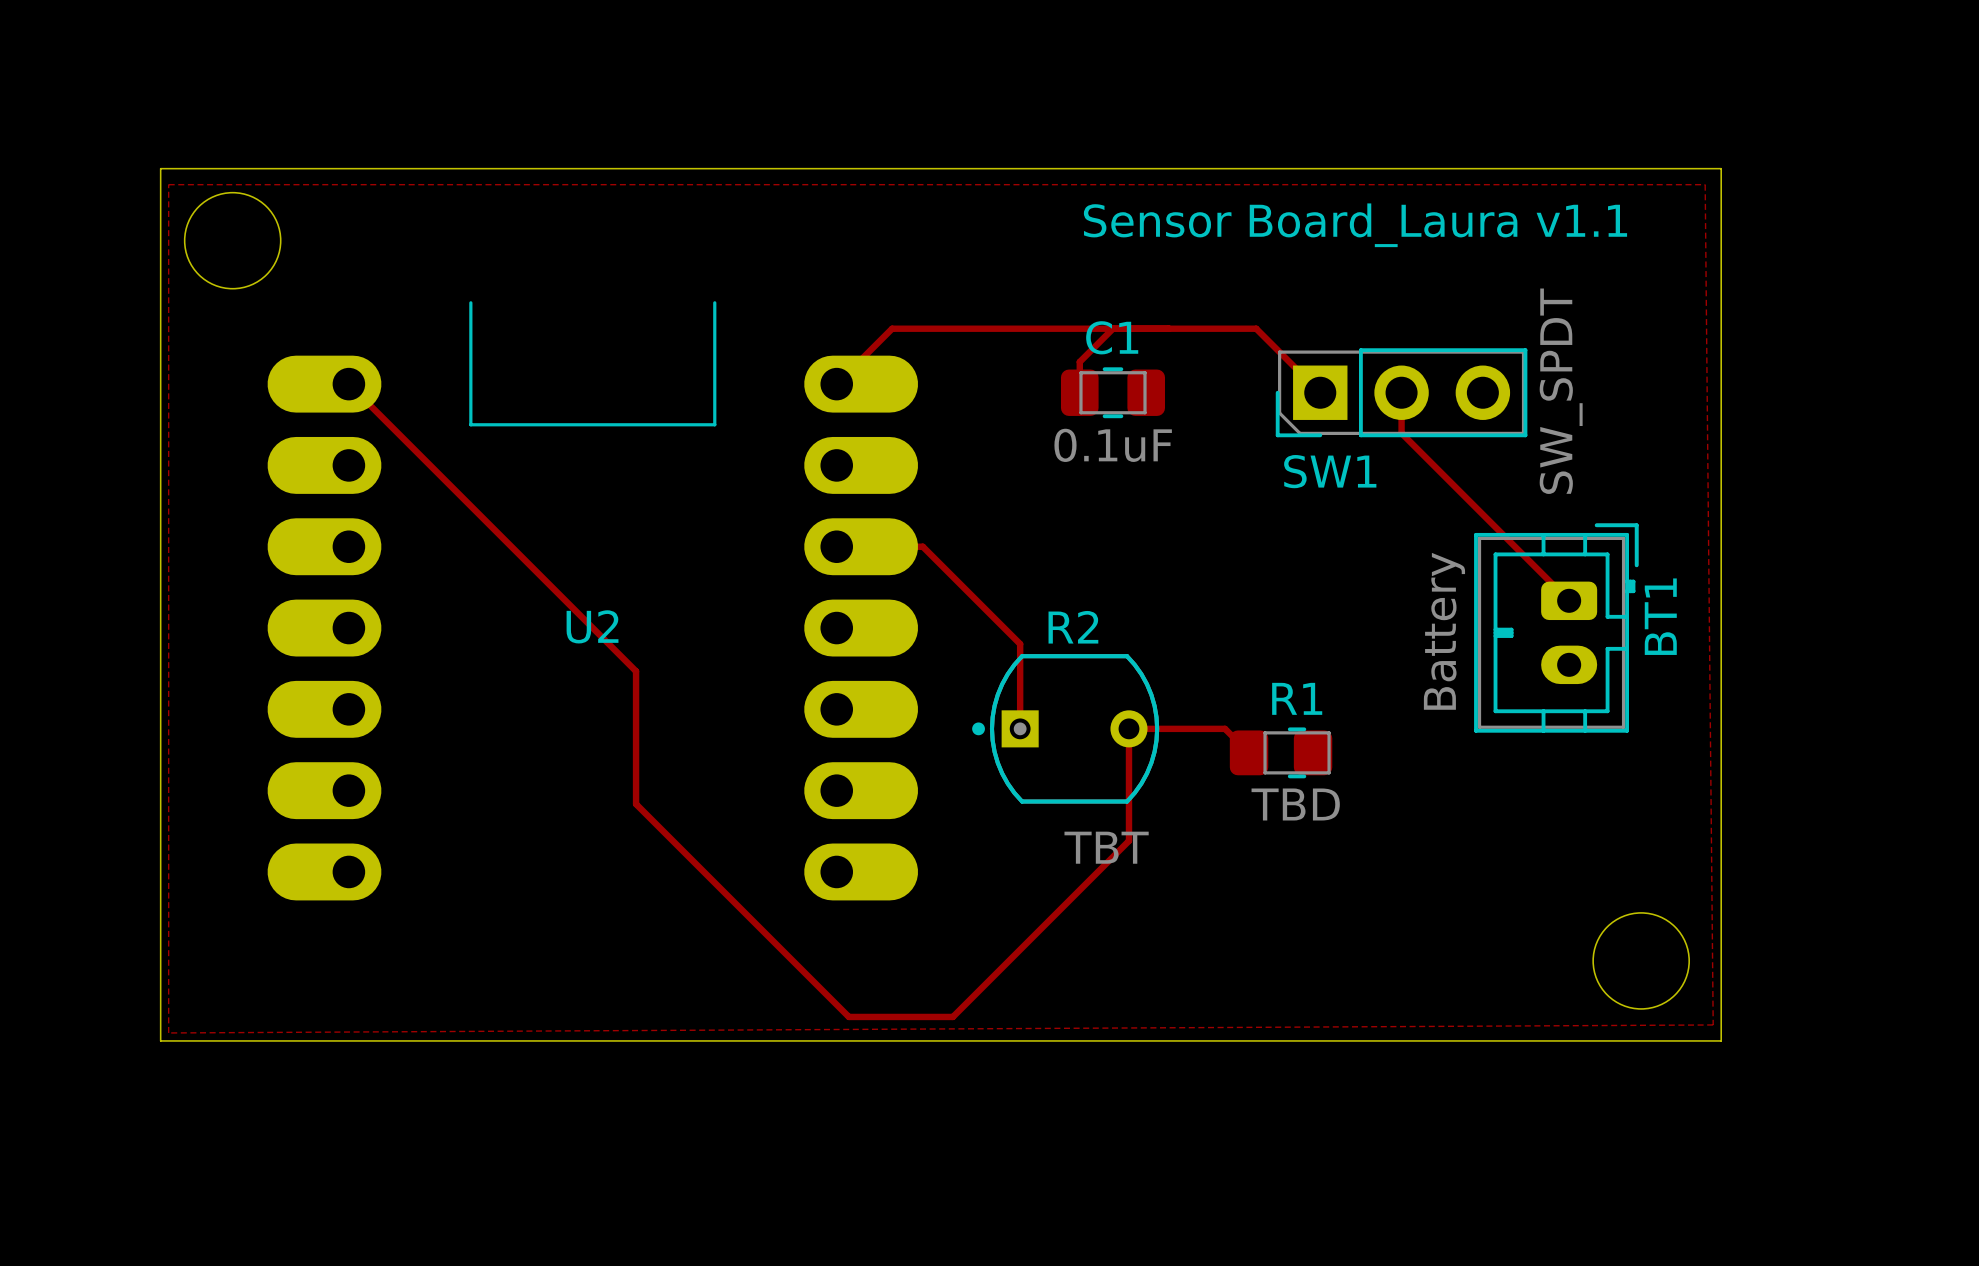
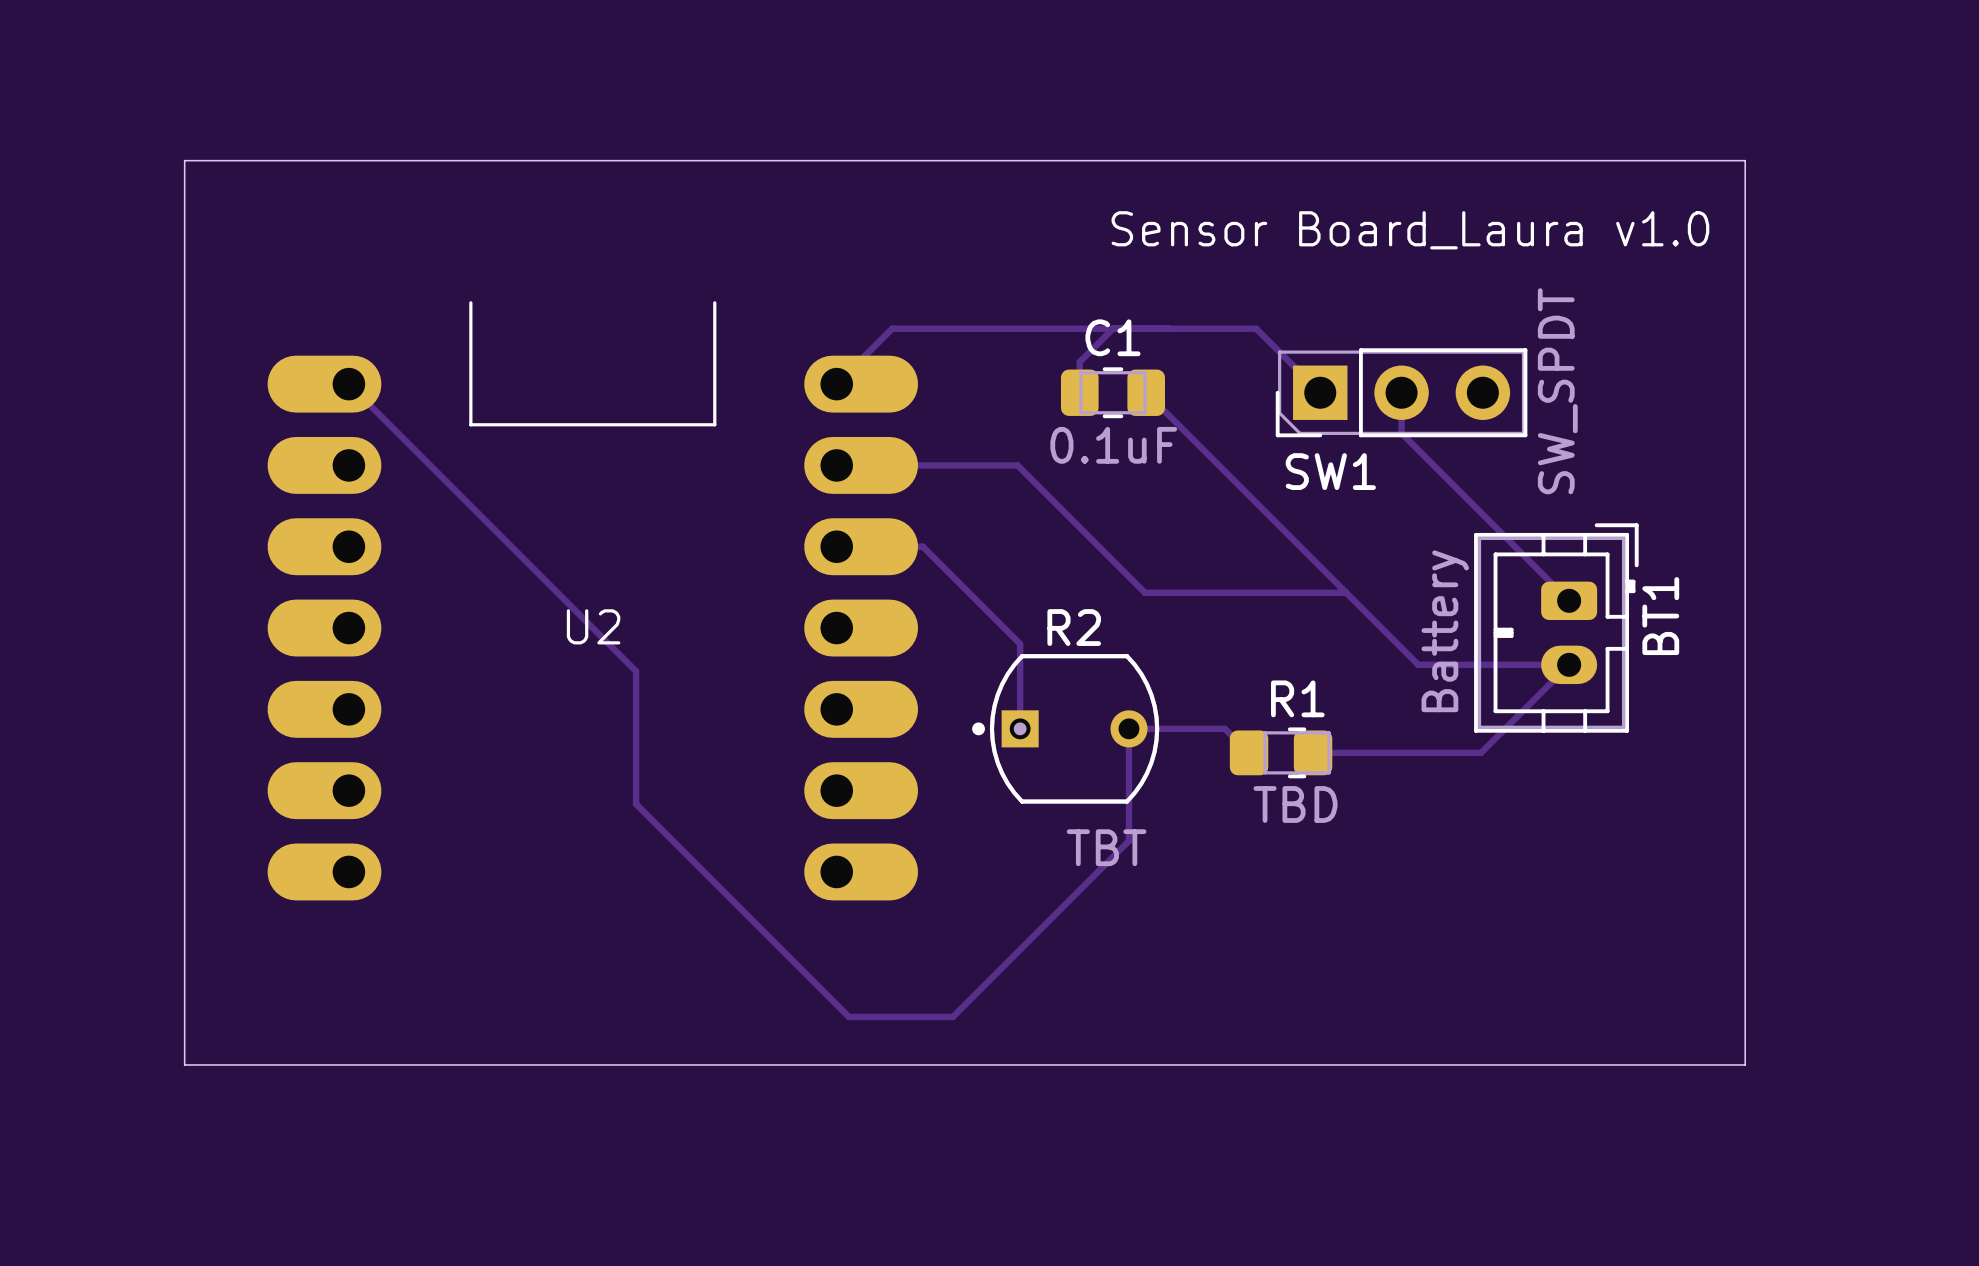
board edge: (160, 168) (1721, 168) (1721, 1040) (160, 1040) (160, 168) -> (184, 160) (184, 1064) (1745, 1064) (1745, 160) (184, 160)
zone outline: (168, 184) (1705, 184) (1713, 1024) (168, 1032) (168, 184) -> none
round board edge: [183, 191, 282, 290] -> none
text: Sensor Board_Laura v1.1 (1355, 225) -> Sensor Board_Laura v1.0 (1410, 230)
track: none -> (1146, 392) (1418, 664) (1569, 664) (1481, 752) (1313, 752)
track: none -> (836, 465) (1017, 465) (1145, 592) (1345, 592)
round board edge: [1592, 912, 1690, 1010] -> none

